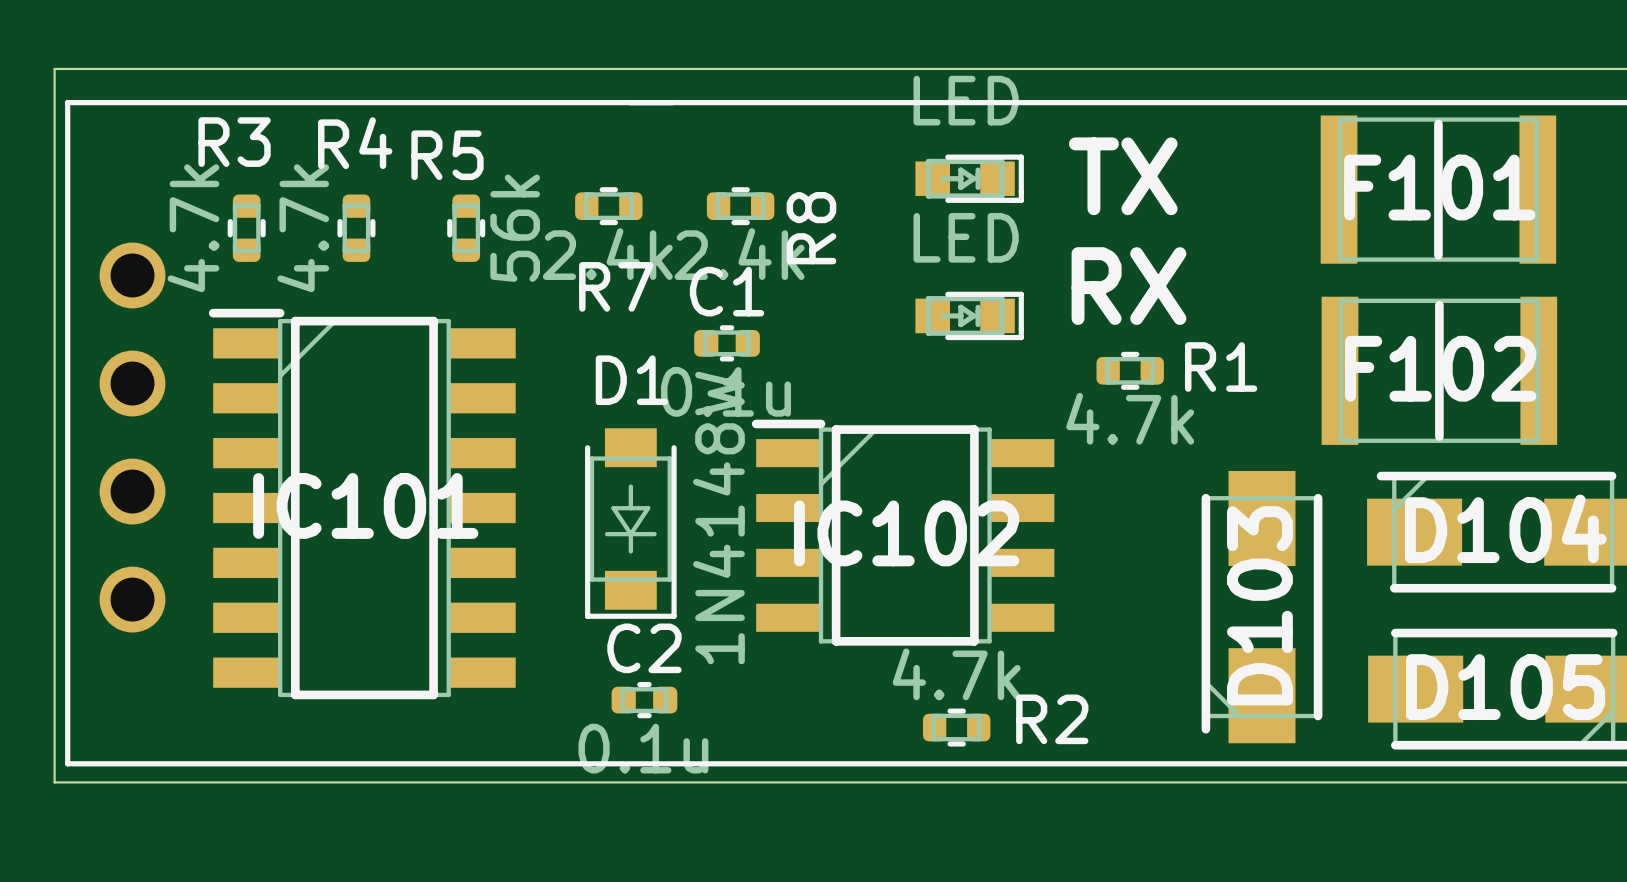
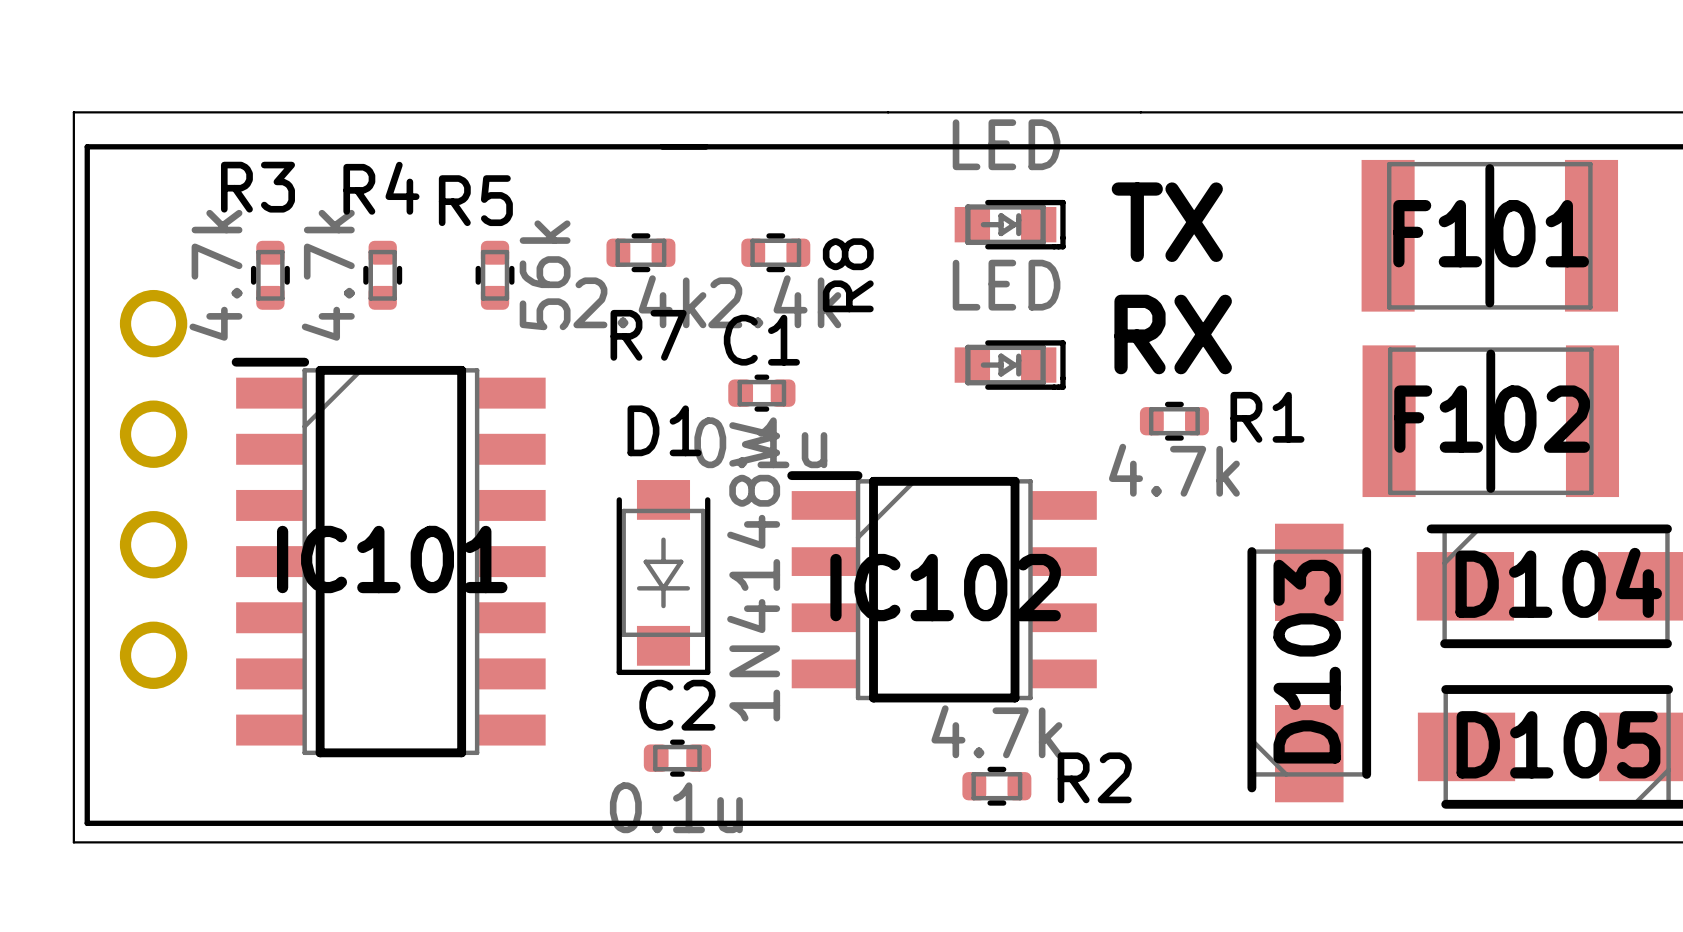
F101 footprint: [1320, 115, 1557, 264] -> [1361, 159, 1619, 312]
F102 footprint: [1321, 296, 1558, 445] -> [1362, 345, 1620, 498]

